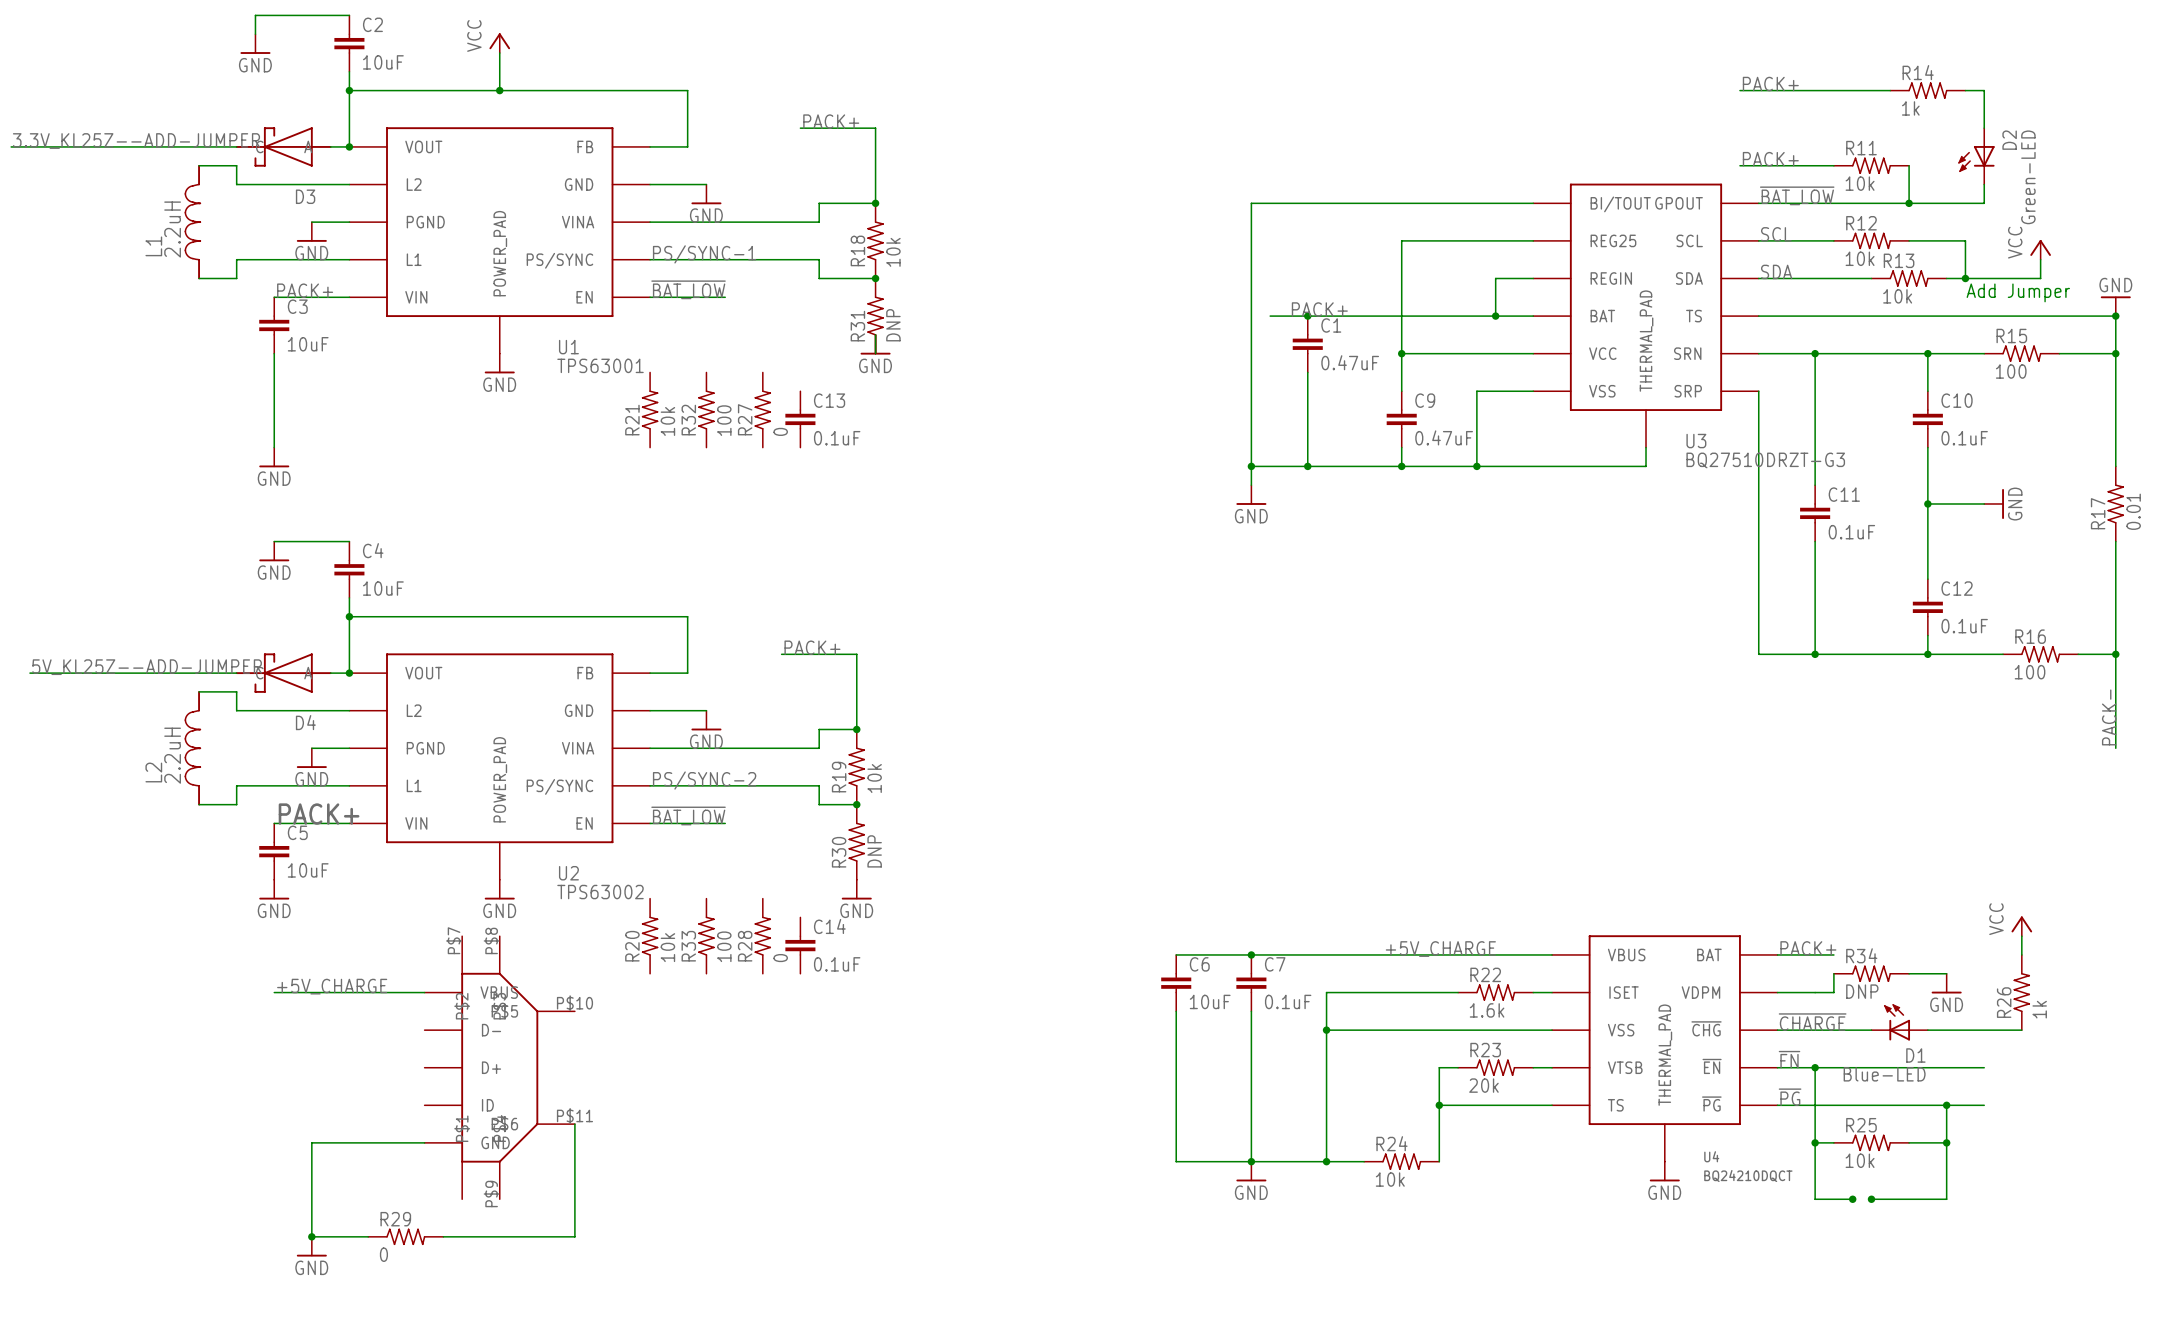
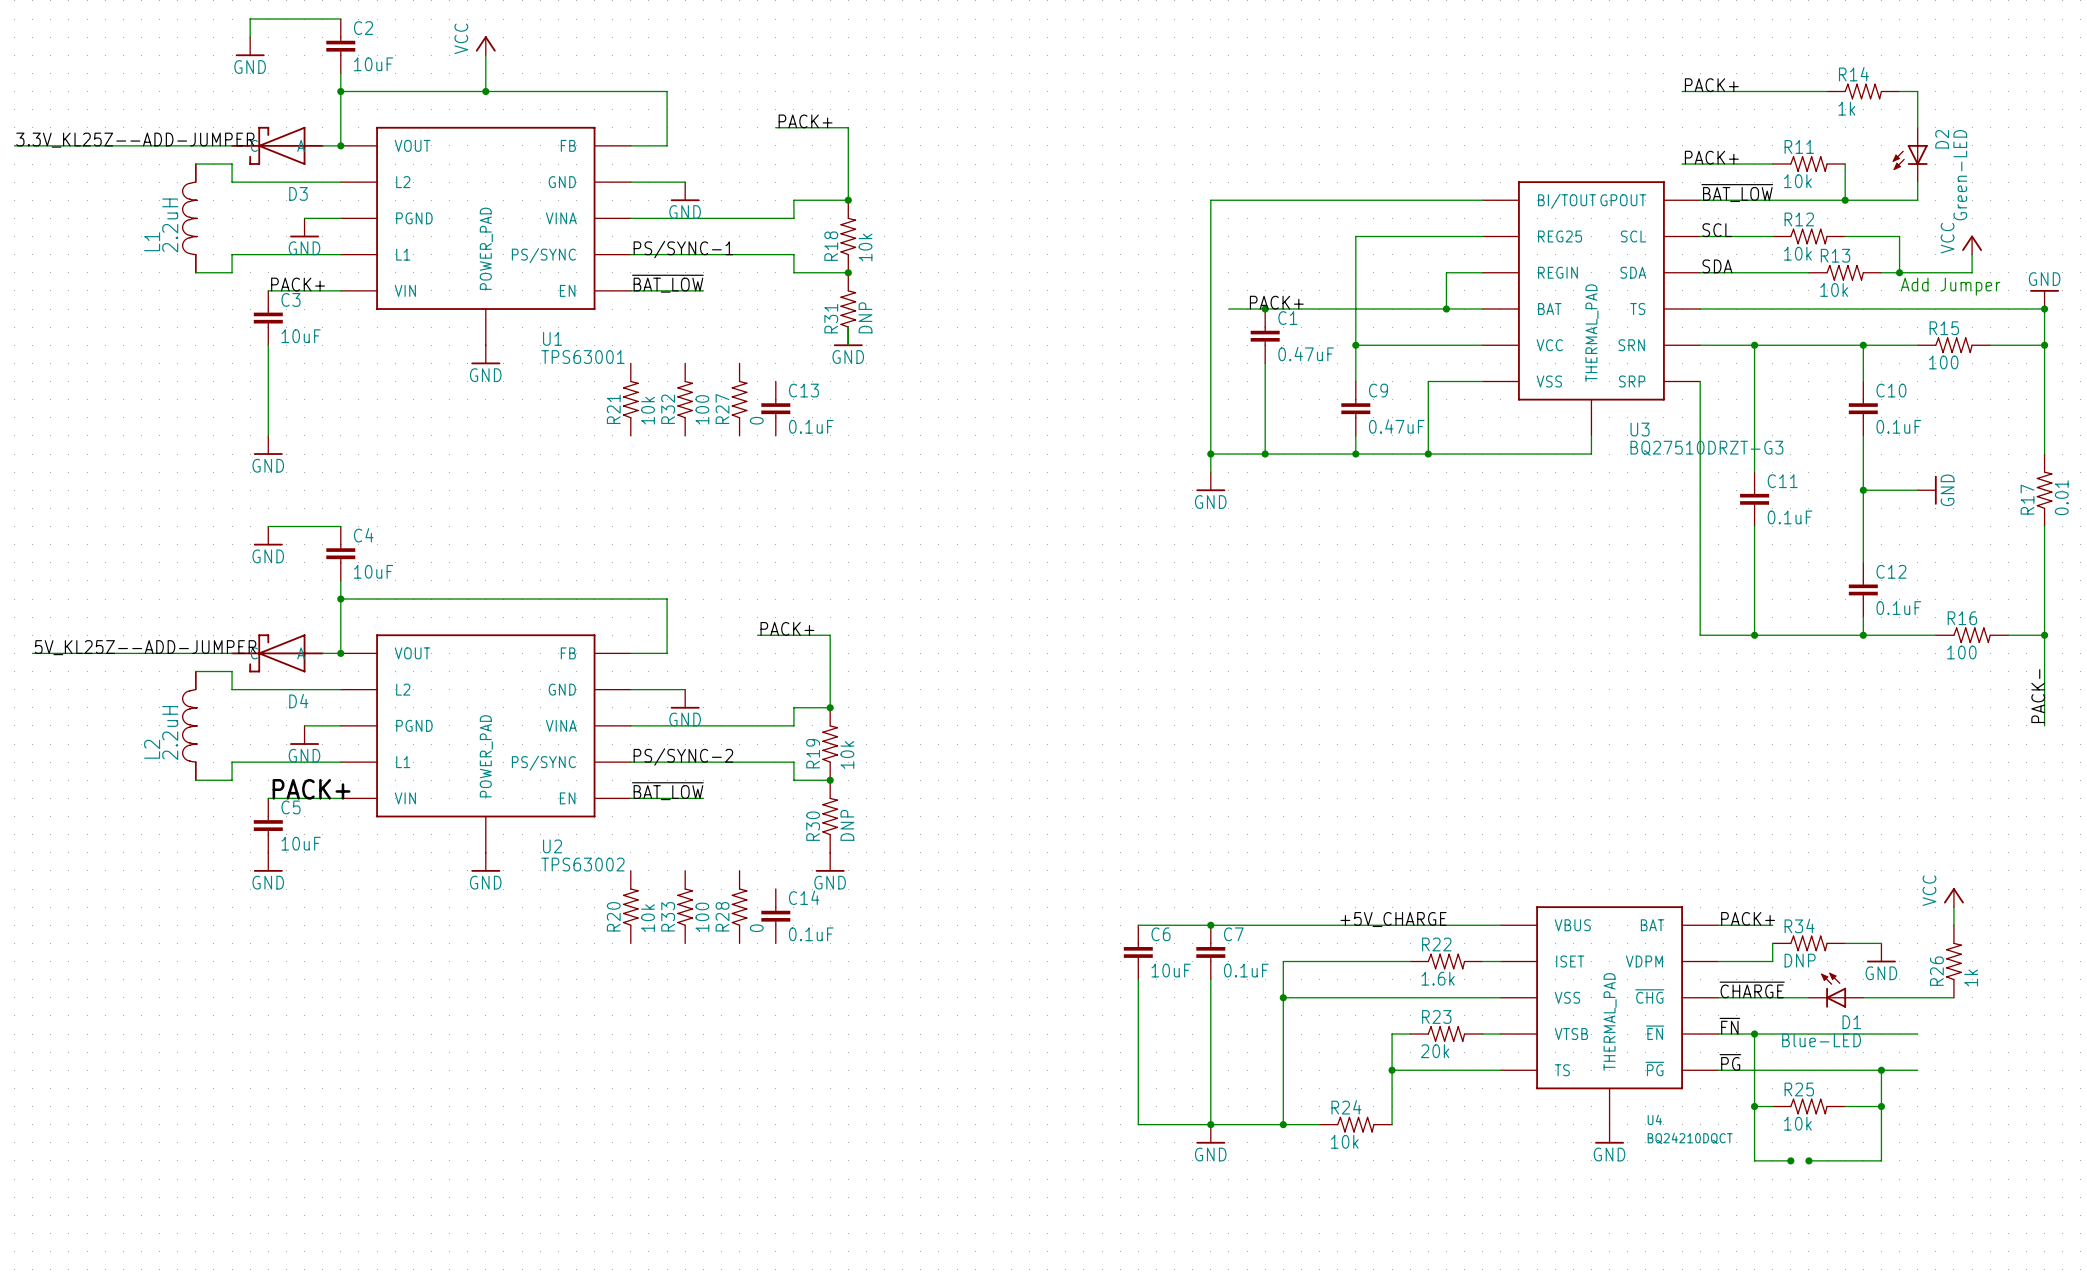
label: +5V_CHARGE (332, 986) -> none
wire: (274, 992) (424, 992) -> none
part: (499, 1067) -> none
wire: (574, 1124) (574, 1236) (443, 1236) -> none
wire: (424, 1142) (311, 1142) (311, 1236) (368, 1236) -> none
junction: (311, 1236) -> none
R29: 0 (405, 1236) -> none
power symbol: GND (311, 1246) -> none

